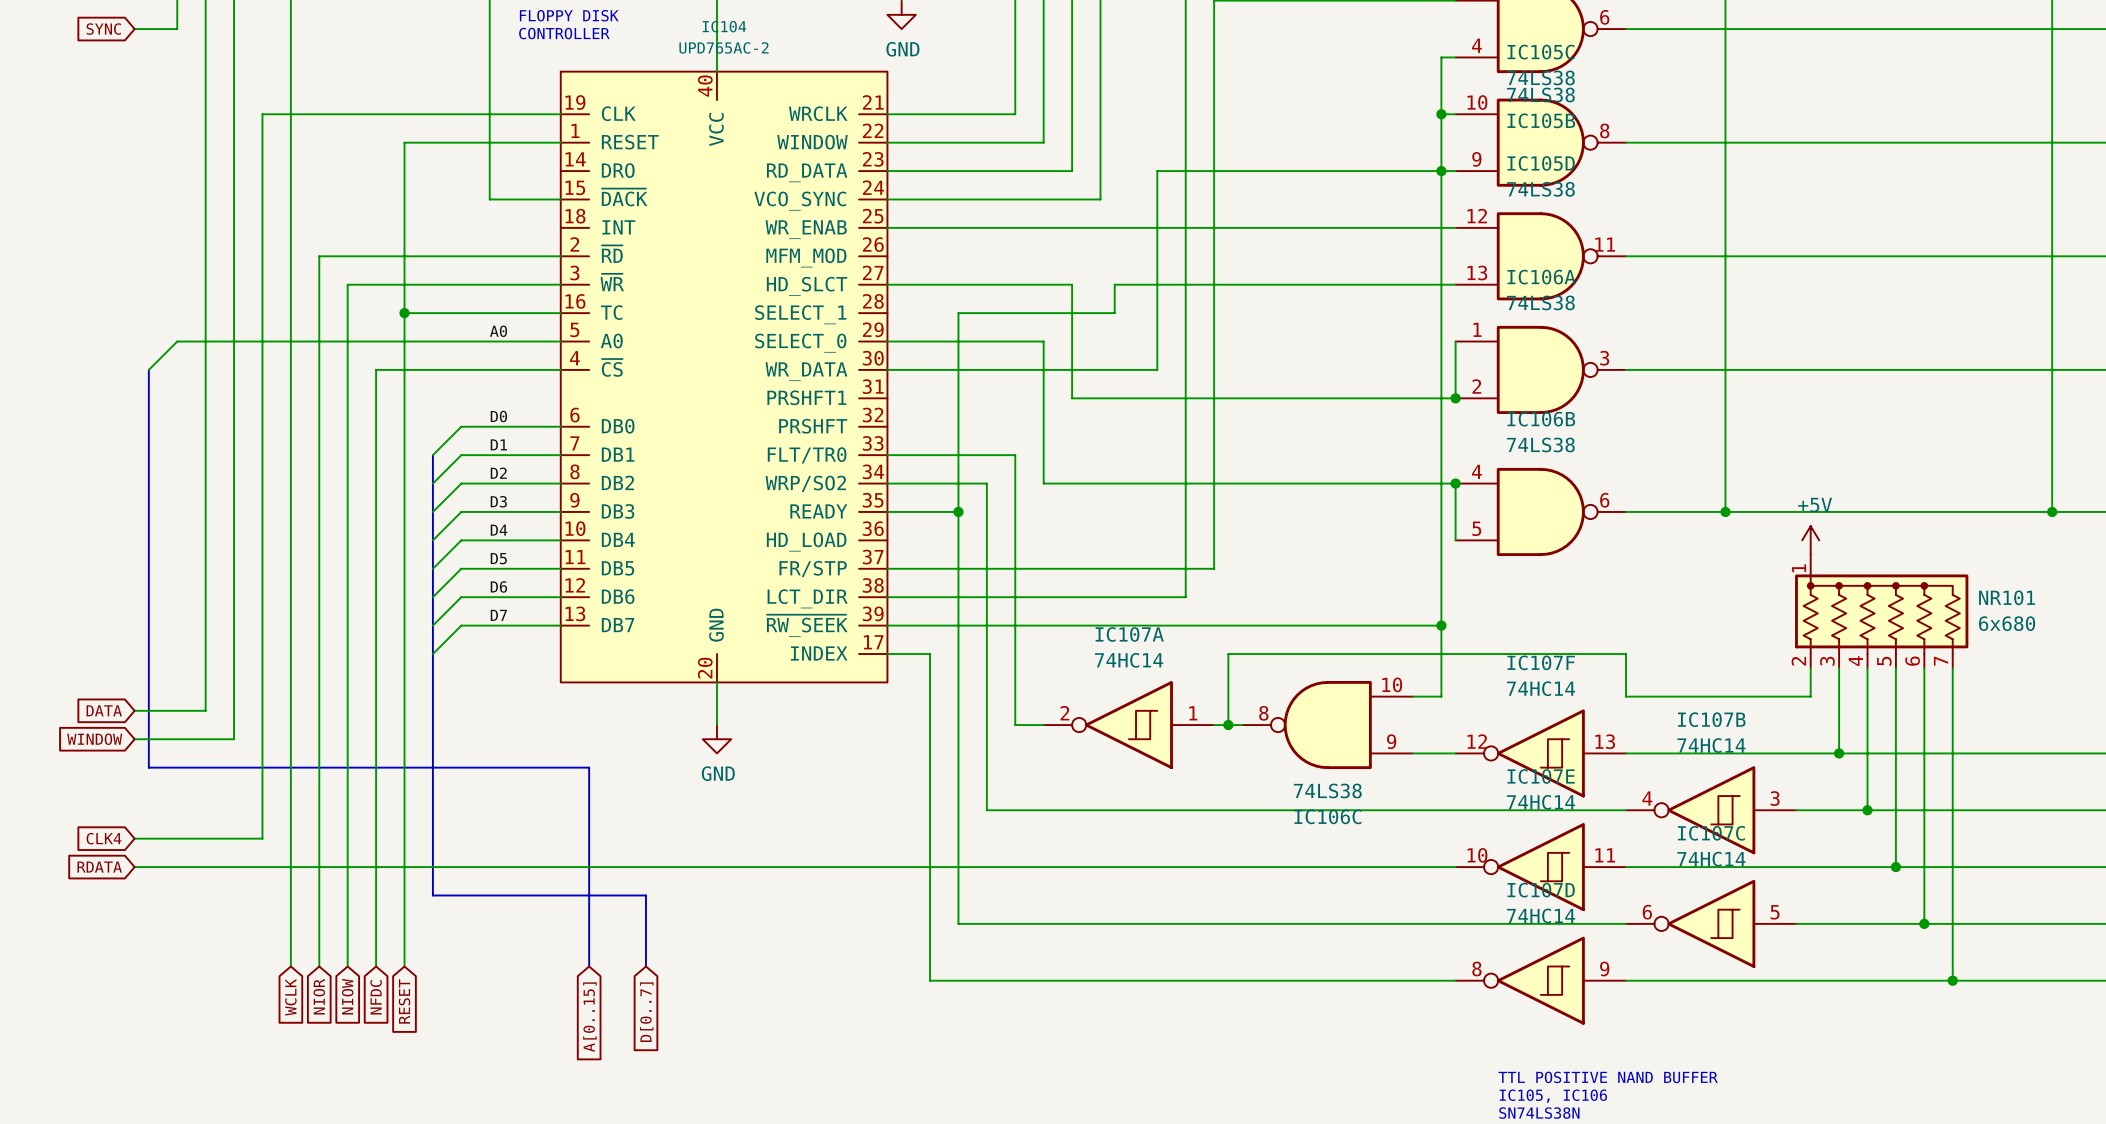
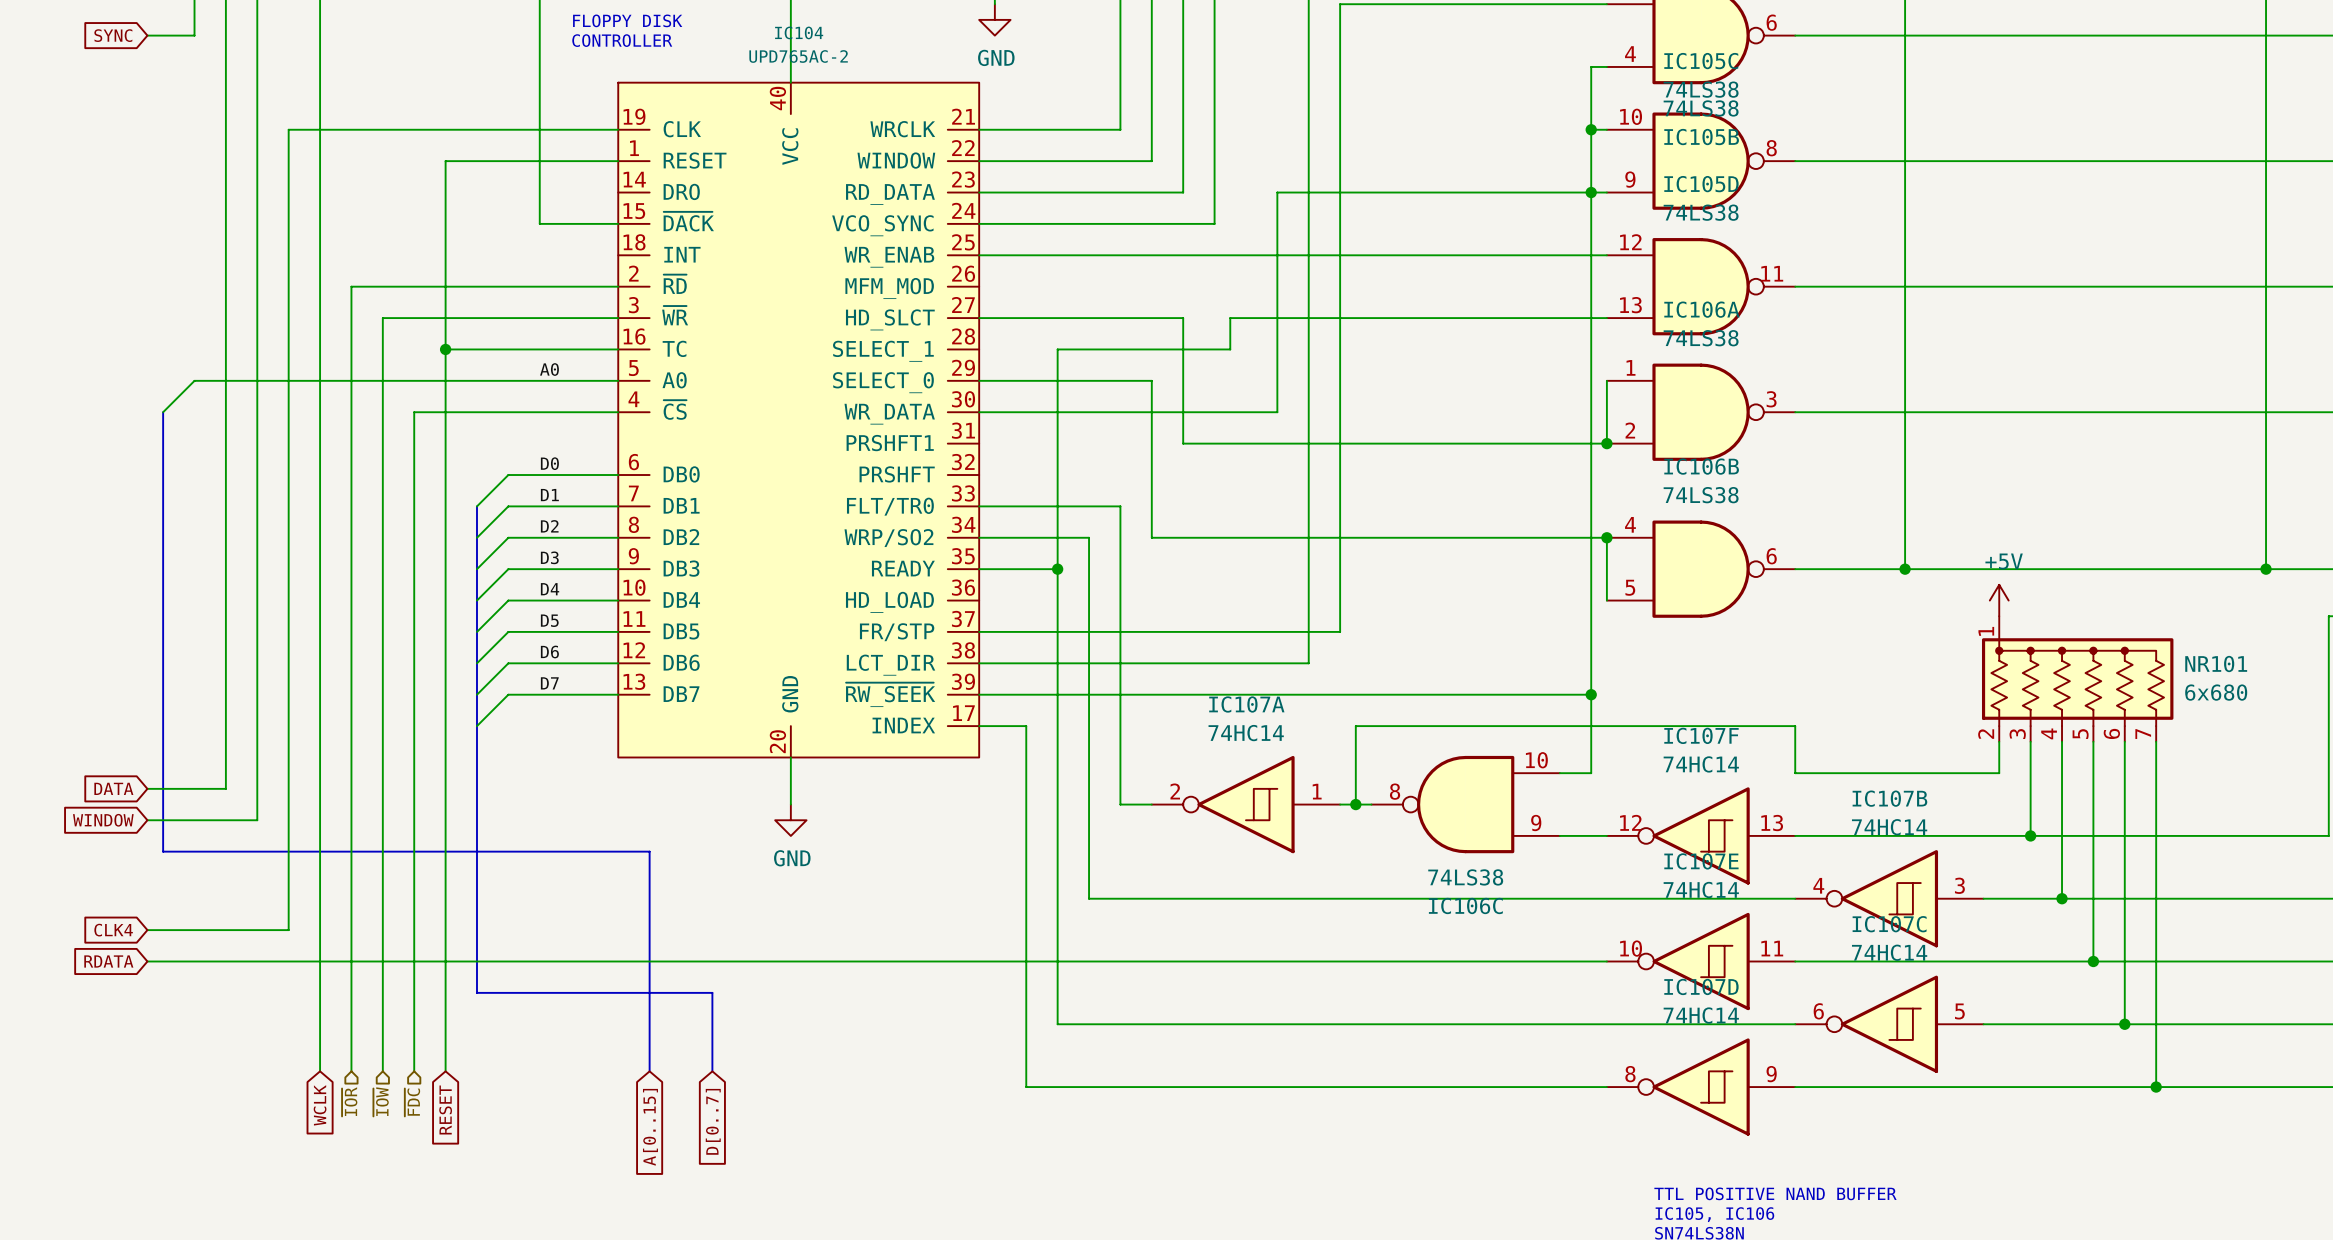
hierarchical label: none -> ~{IOR} (349, 1101)
hierarchical label: none -> ~{IOW} (381, 1101)
hierarchical label: none -> ~{FDC} (412, 1102)
global label: NIOR (319, 996) -> none
global label: NIOW (347, 996) -> none
global label: NFDC (376, 997) -> none

